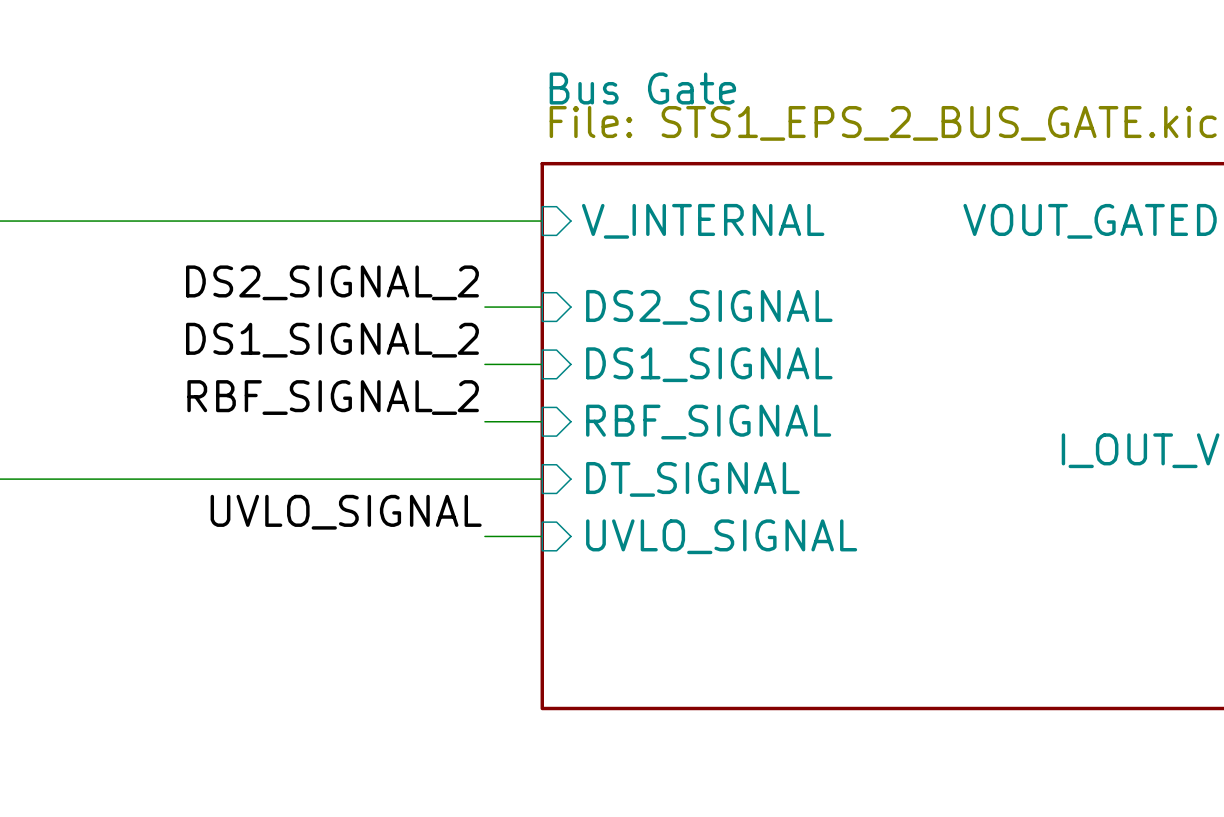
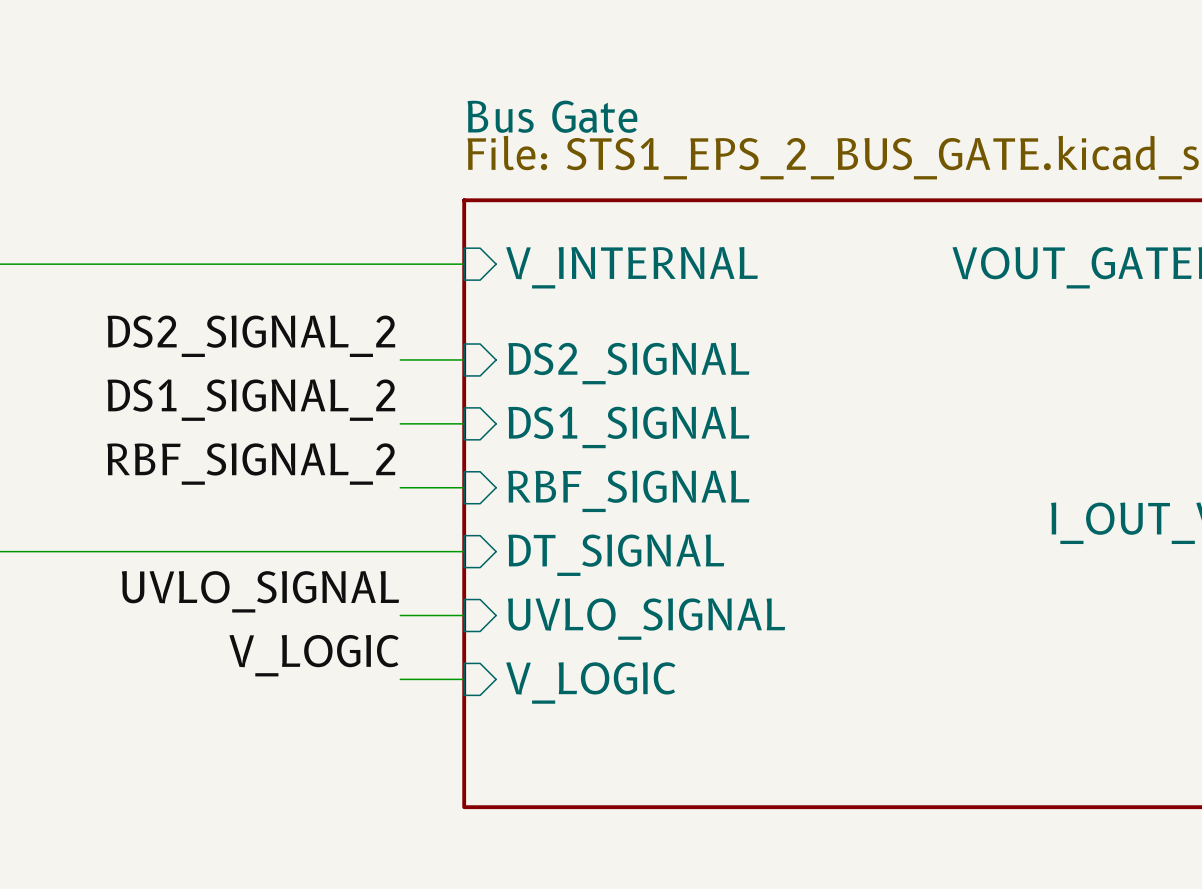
label: none -> V_LOGIC (314, 655)
wire: none -> (400, 679) (464, 679)
sheet pin: none -> V_LOGIC (590, 682)

